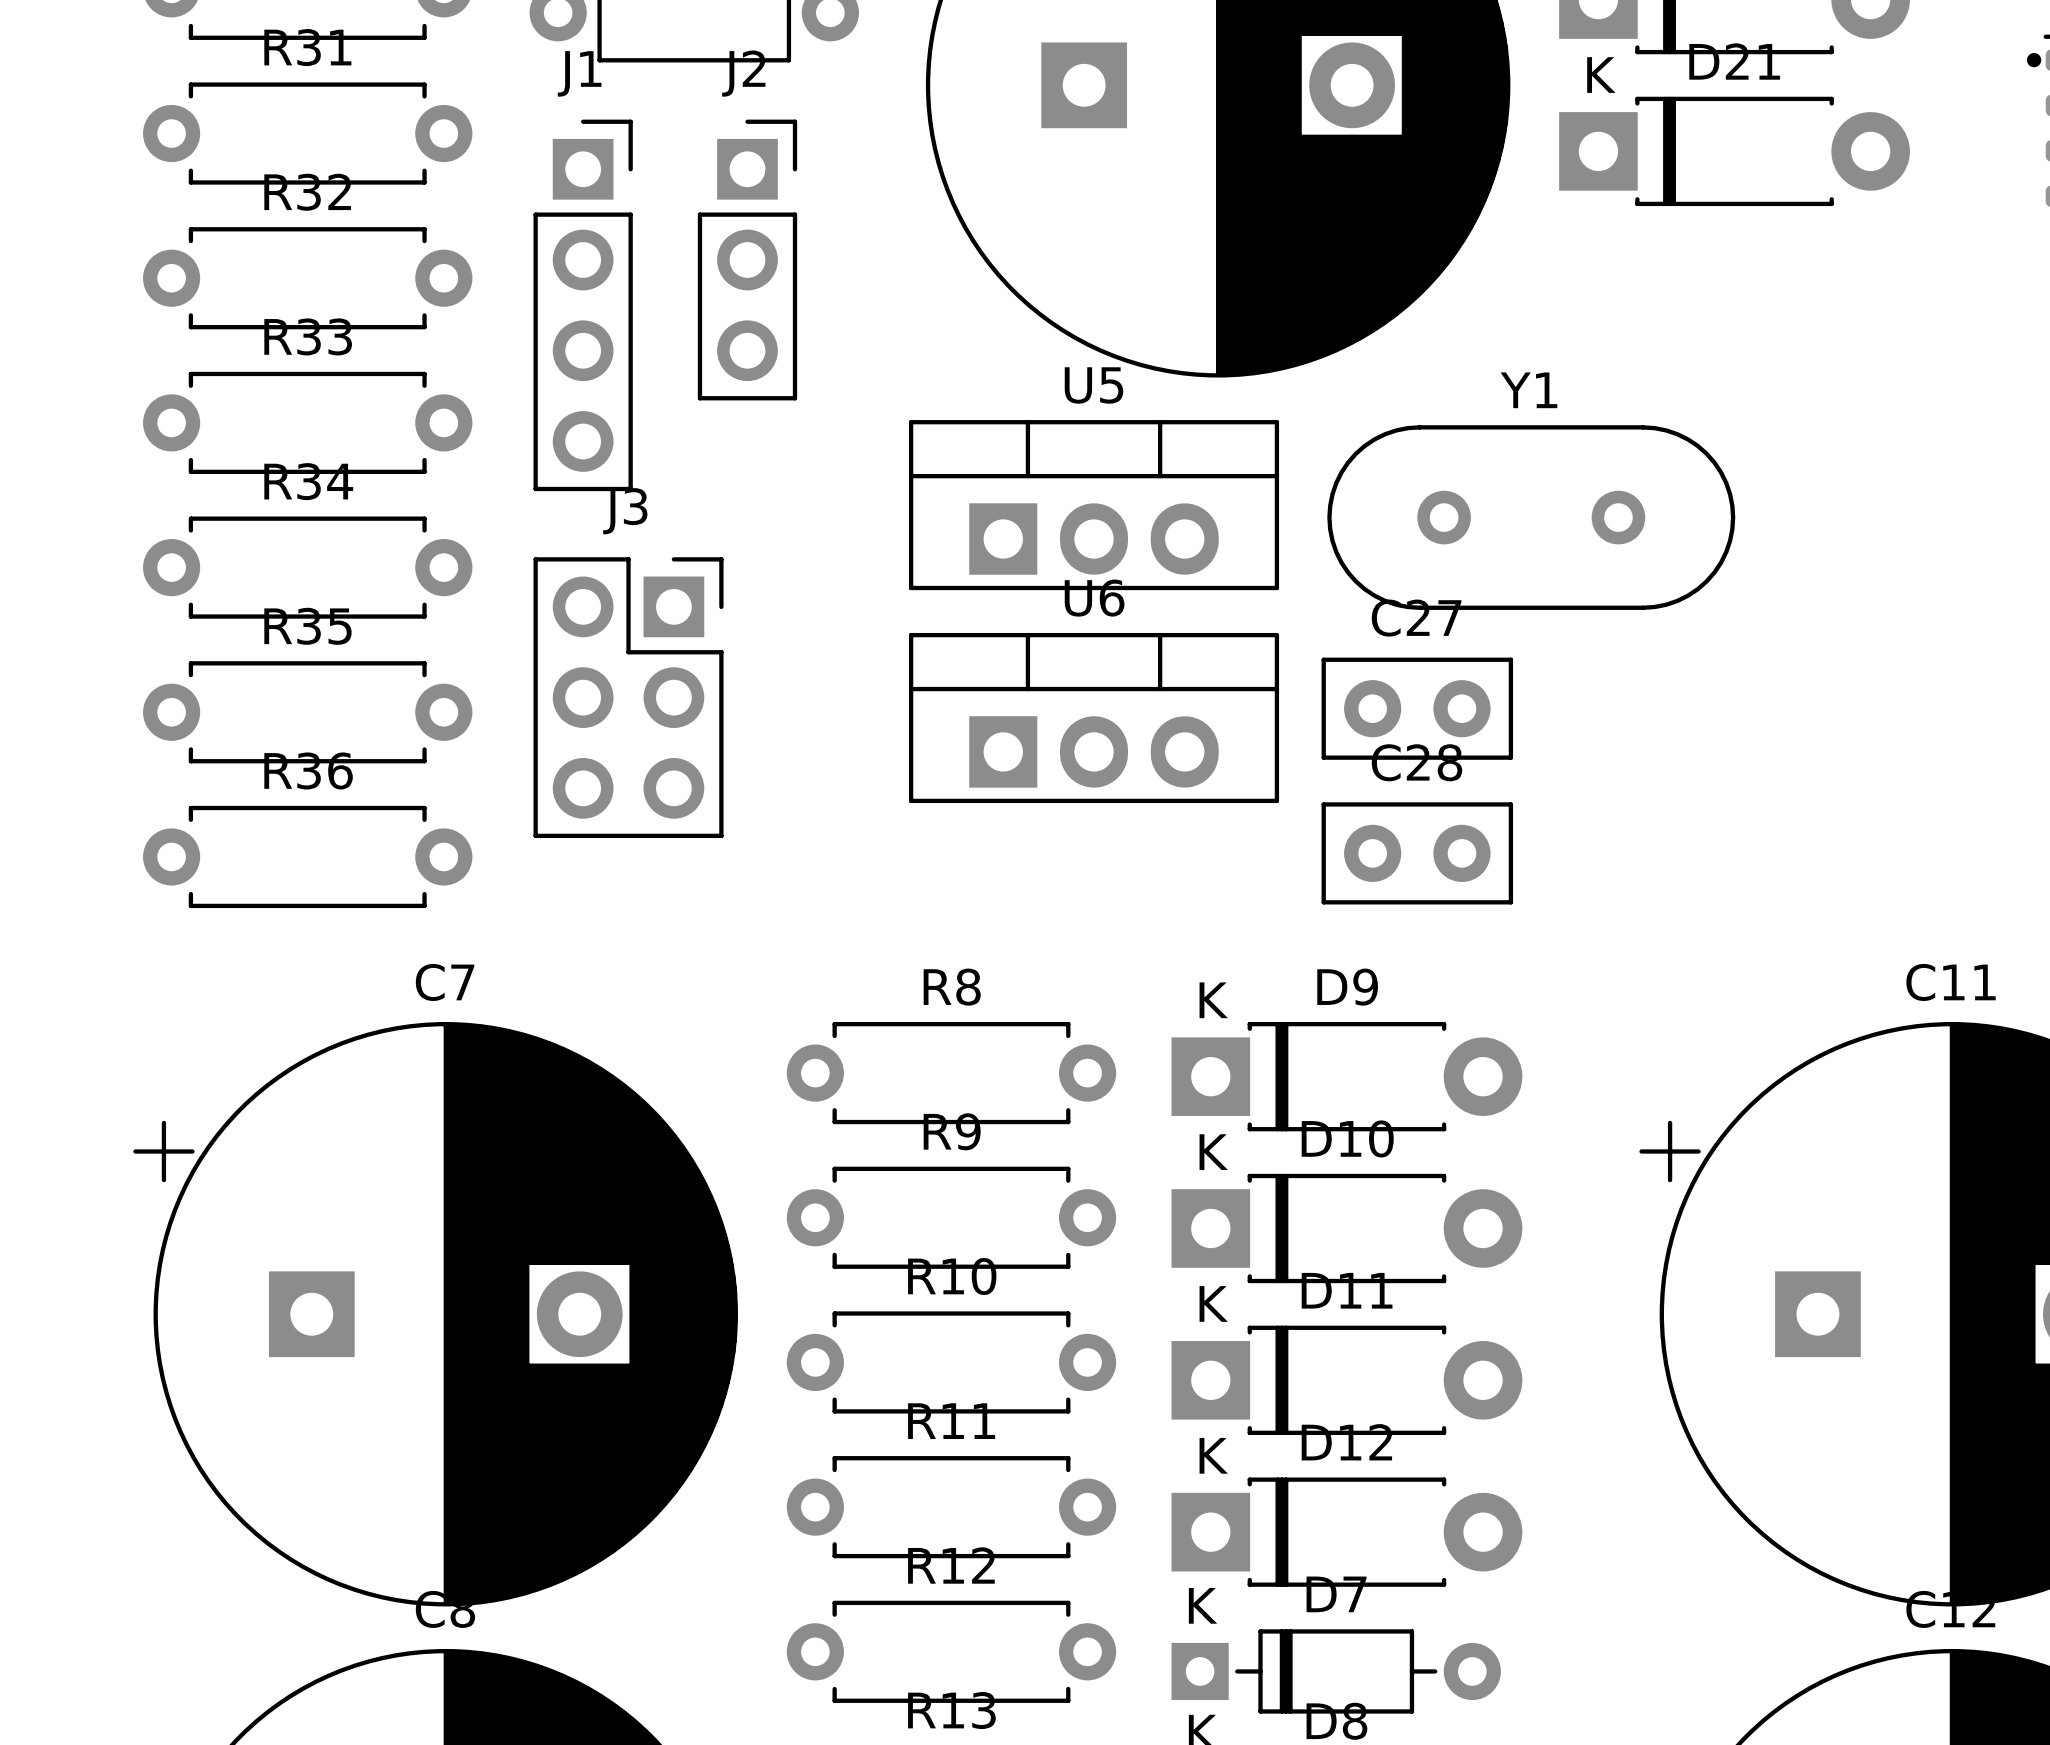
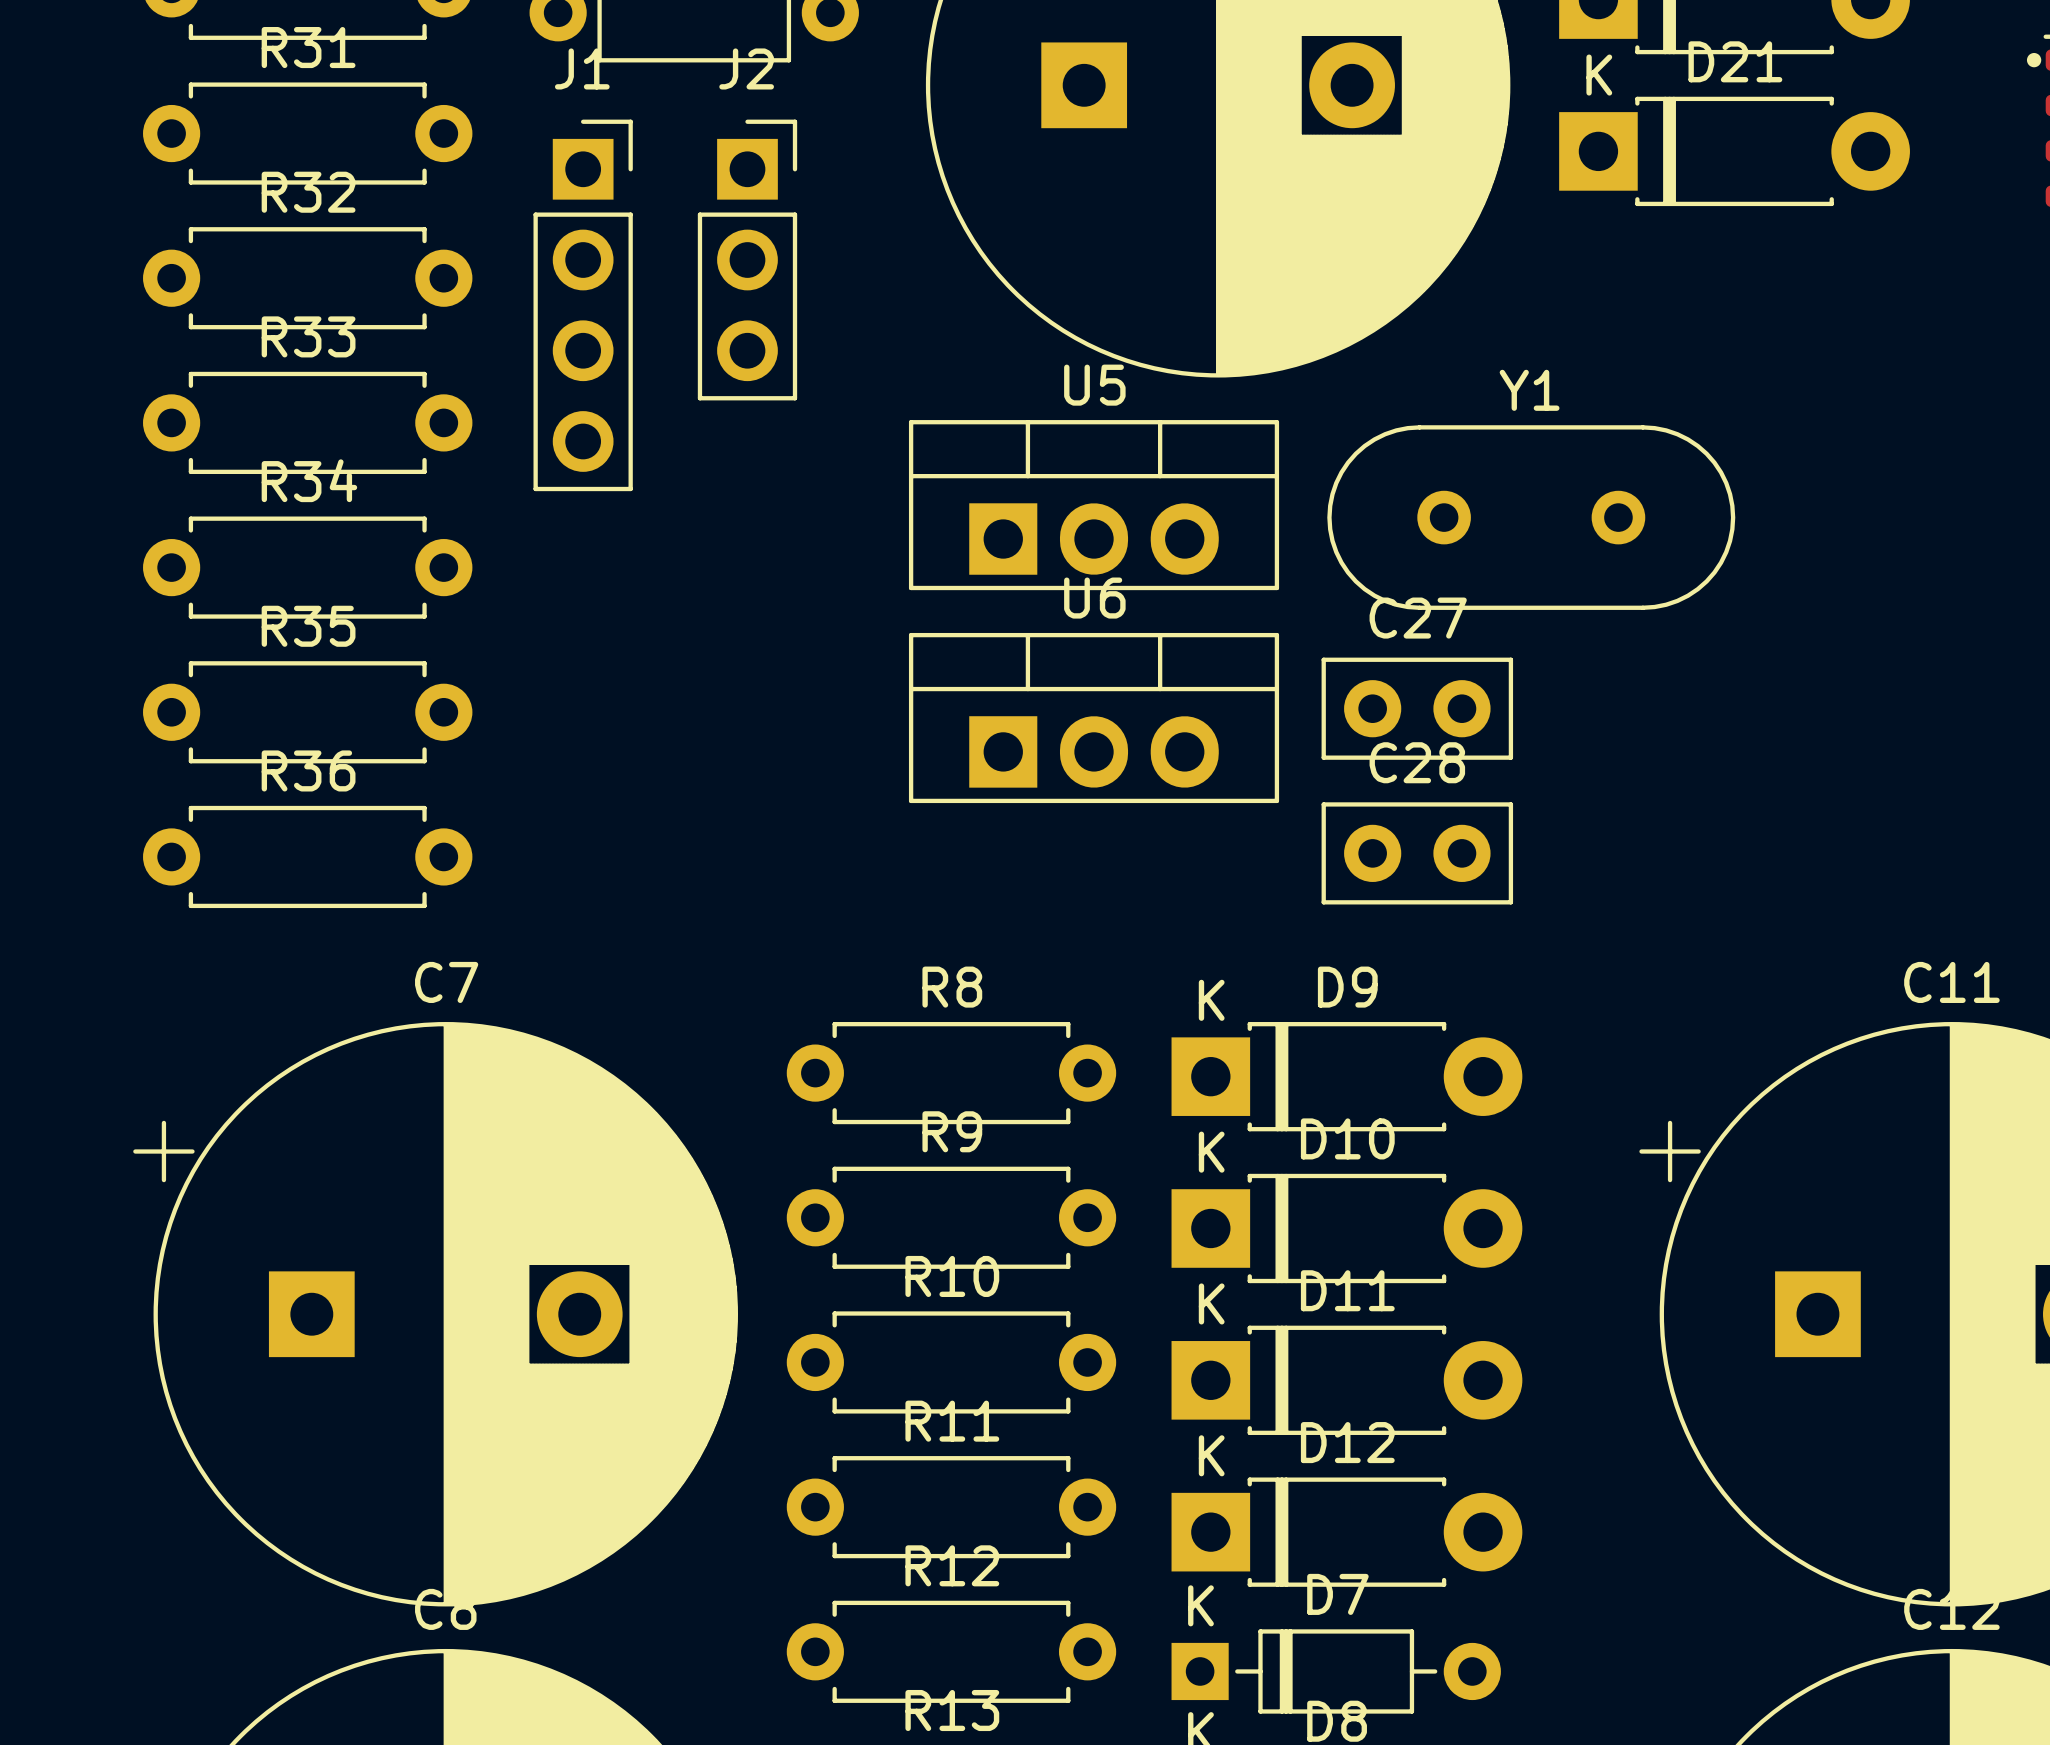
J3: (628, 697) -> none

